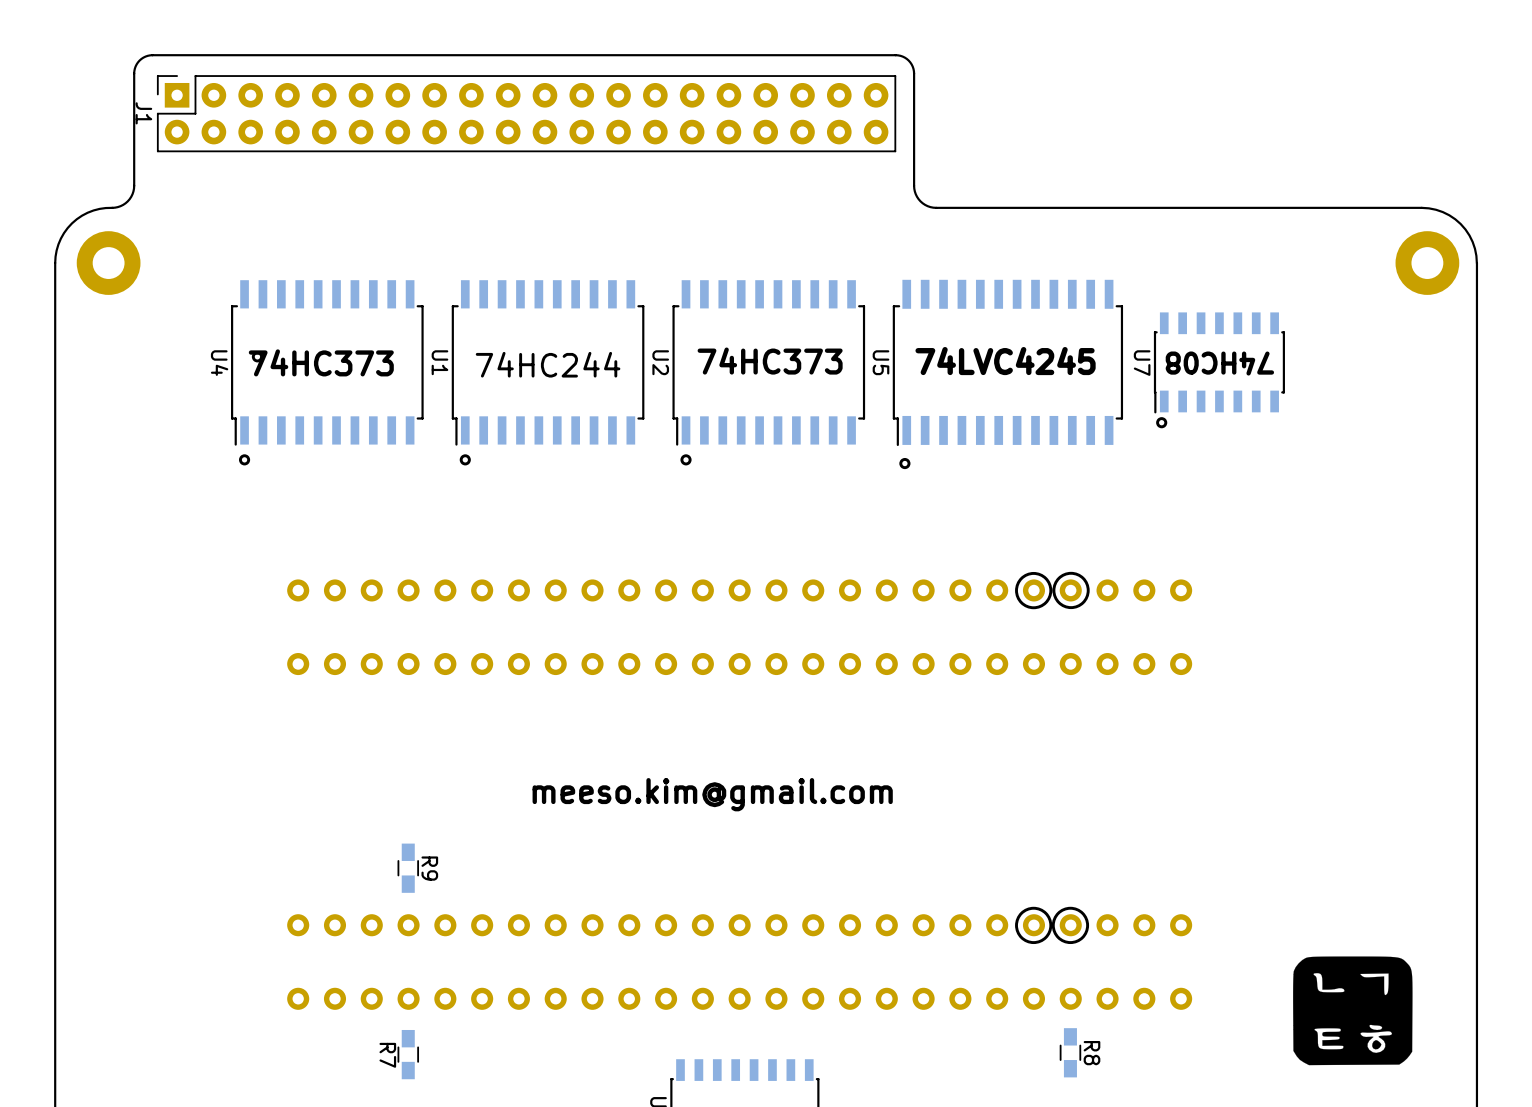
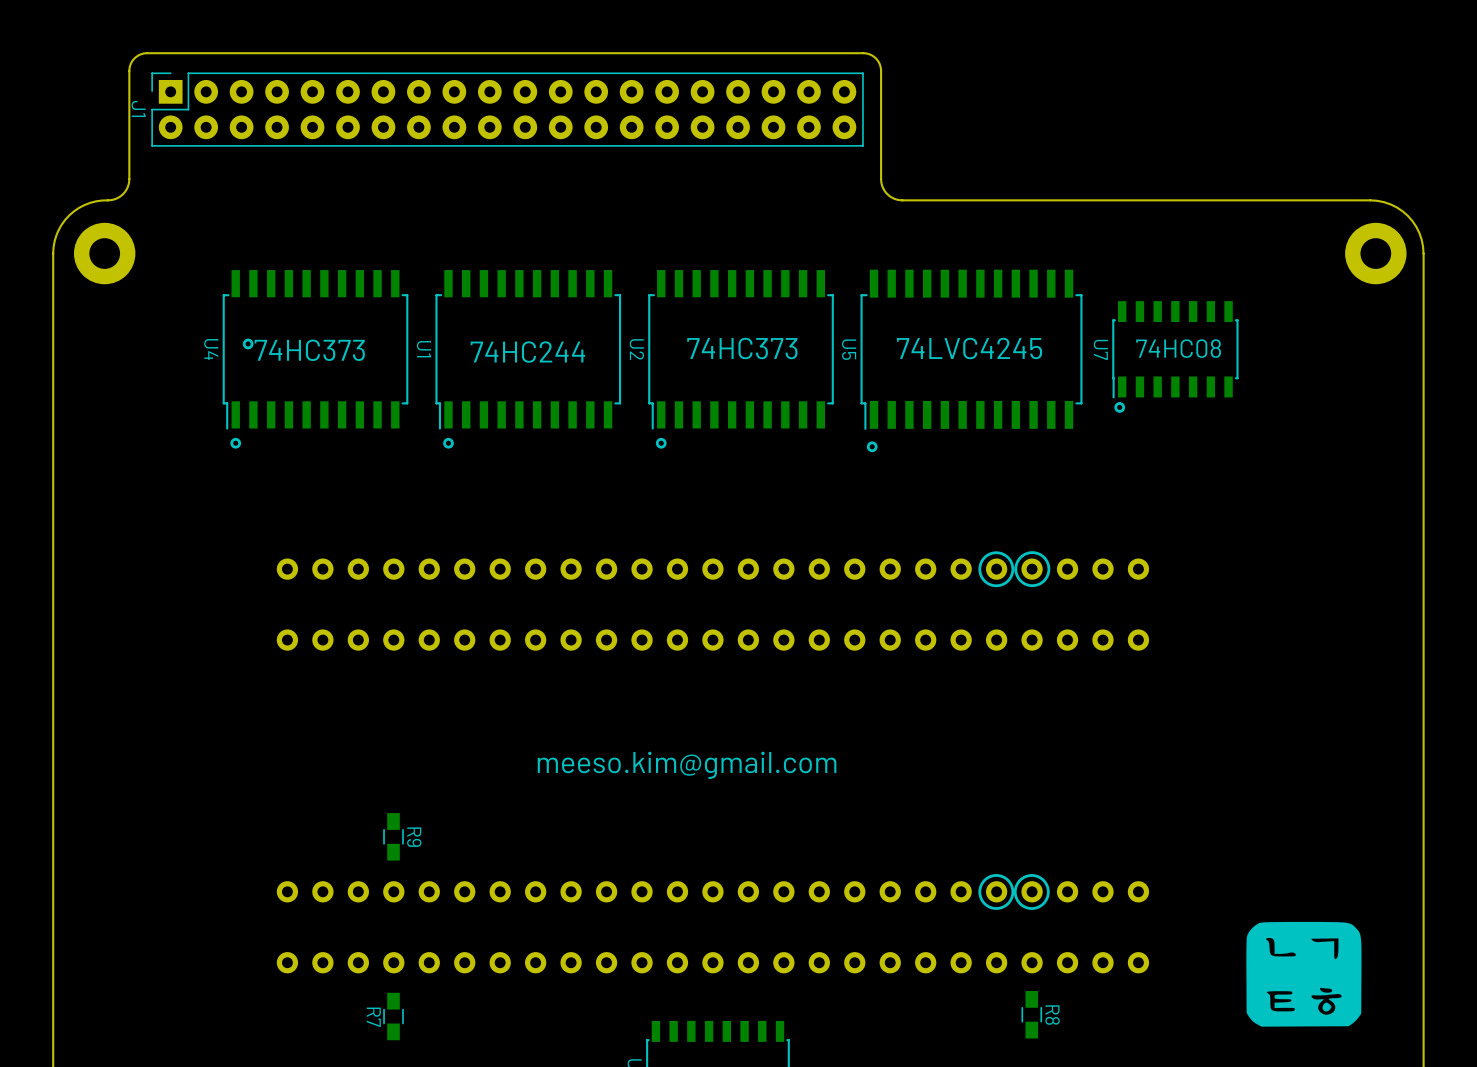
text rotation: 0° (1219, 363) -> 180° (1178, 348)

